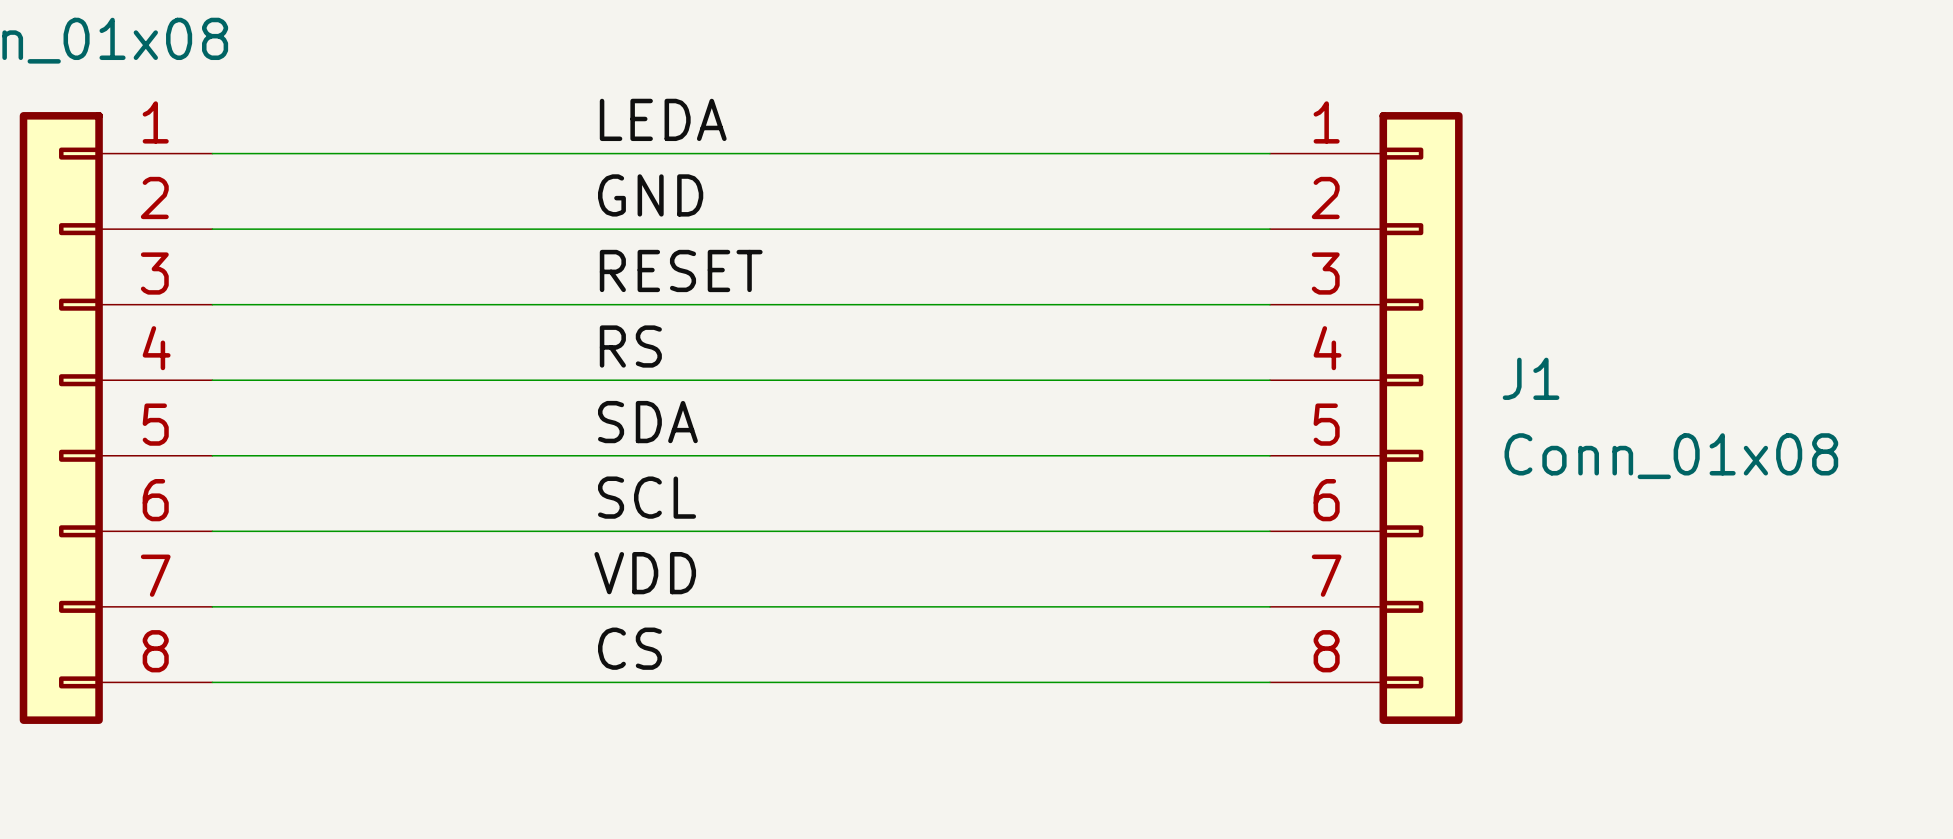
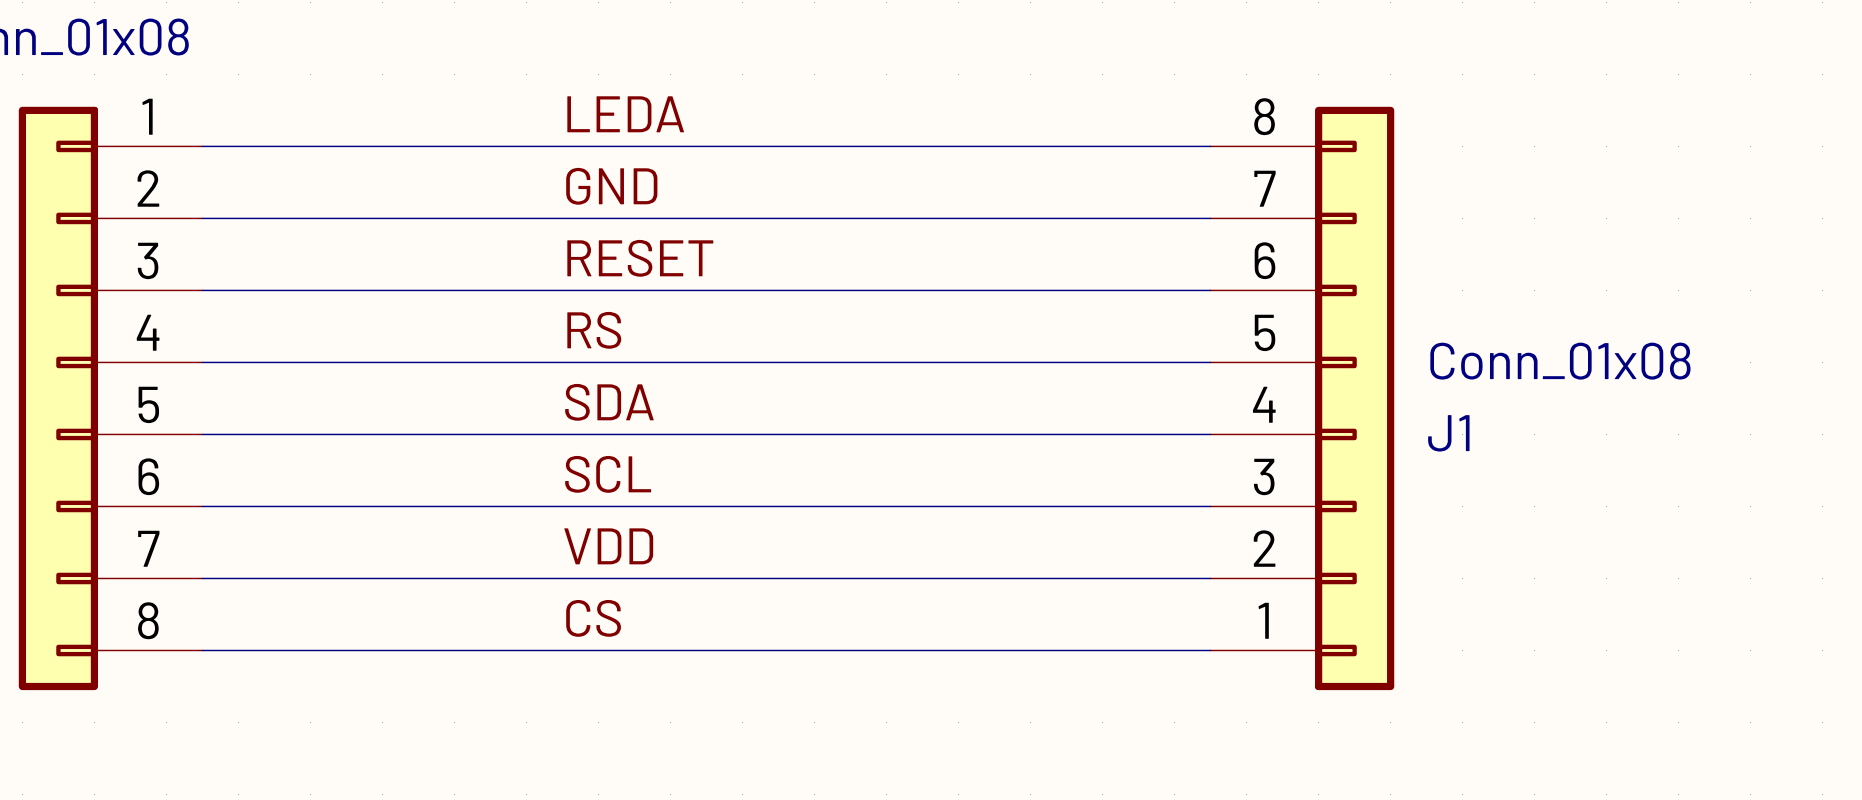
J1 flip: as is (1421, 417) -> up-down (1354, 398)

